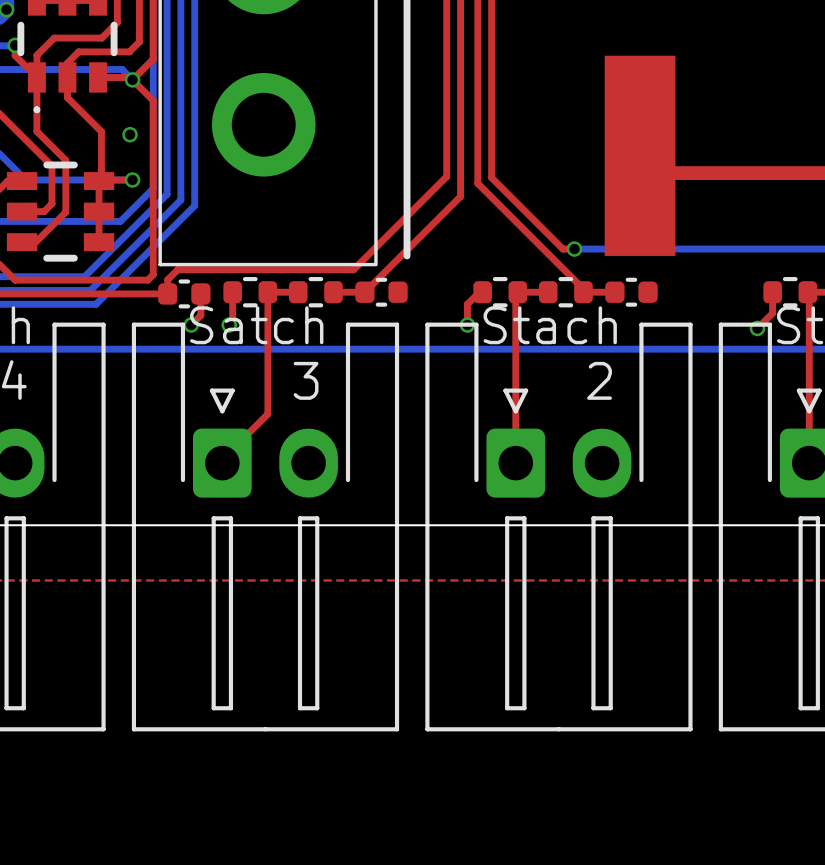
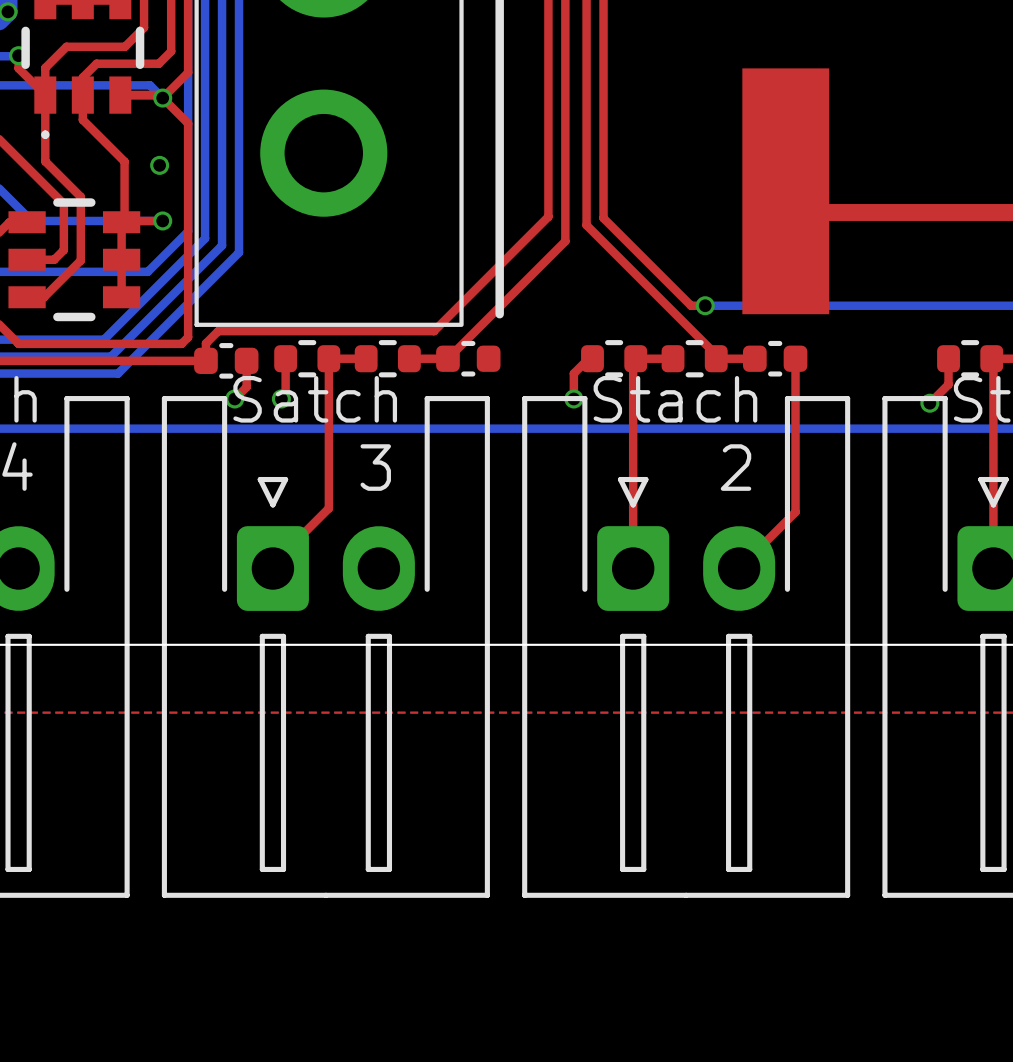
top track: none -> (795, 358) (795, 512) (739, 568)

